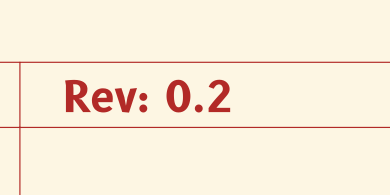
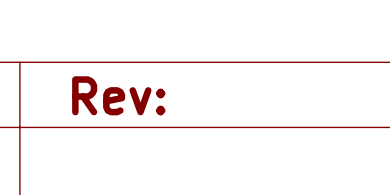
title block: Rev: 0.2 (147, 96) -> Rev: (118, 95)

